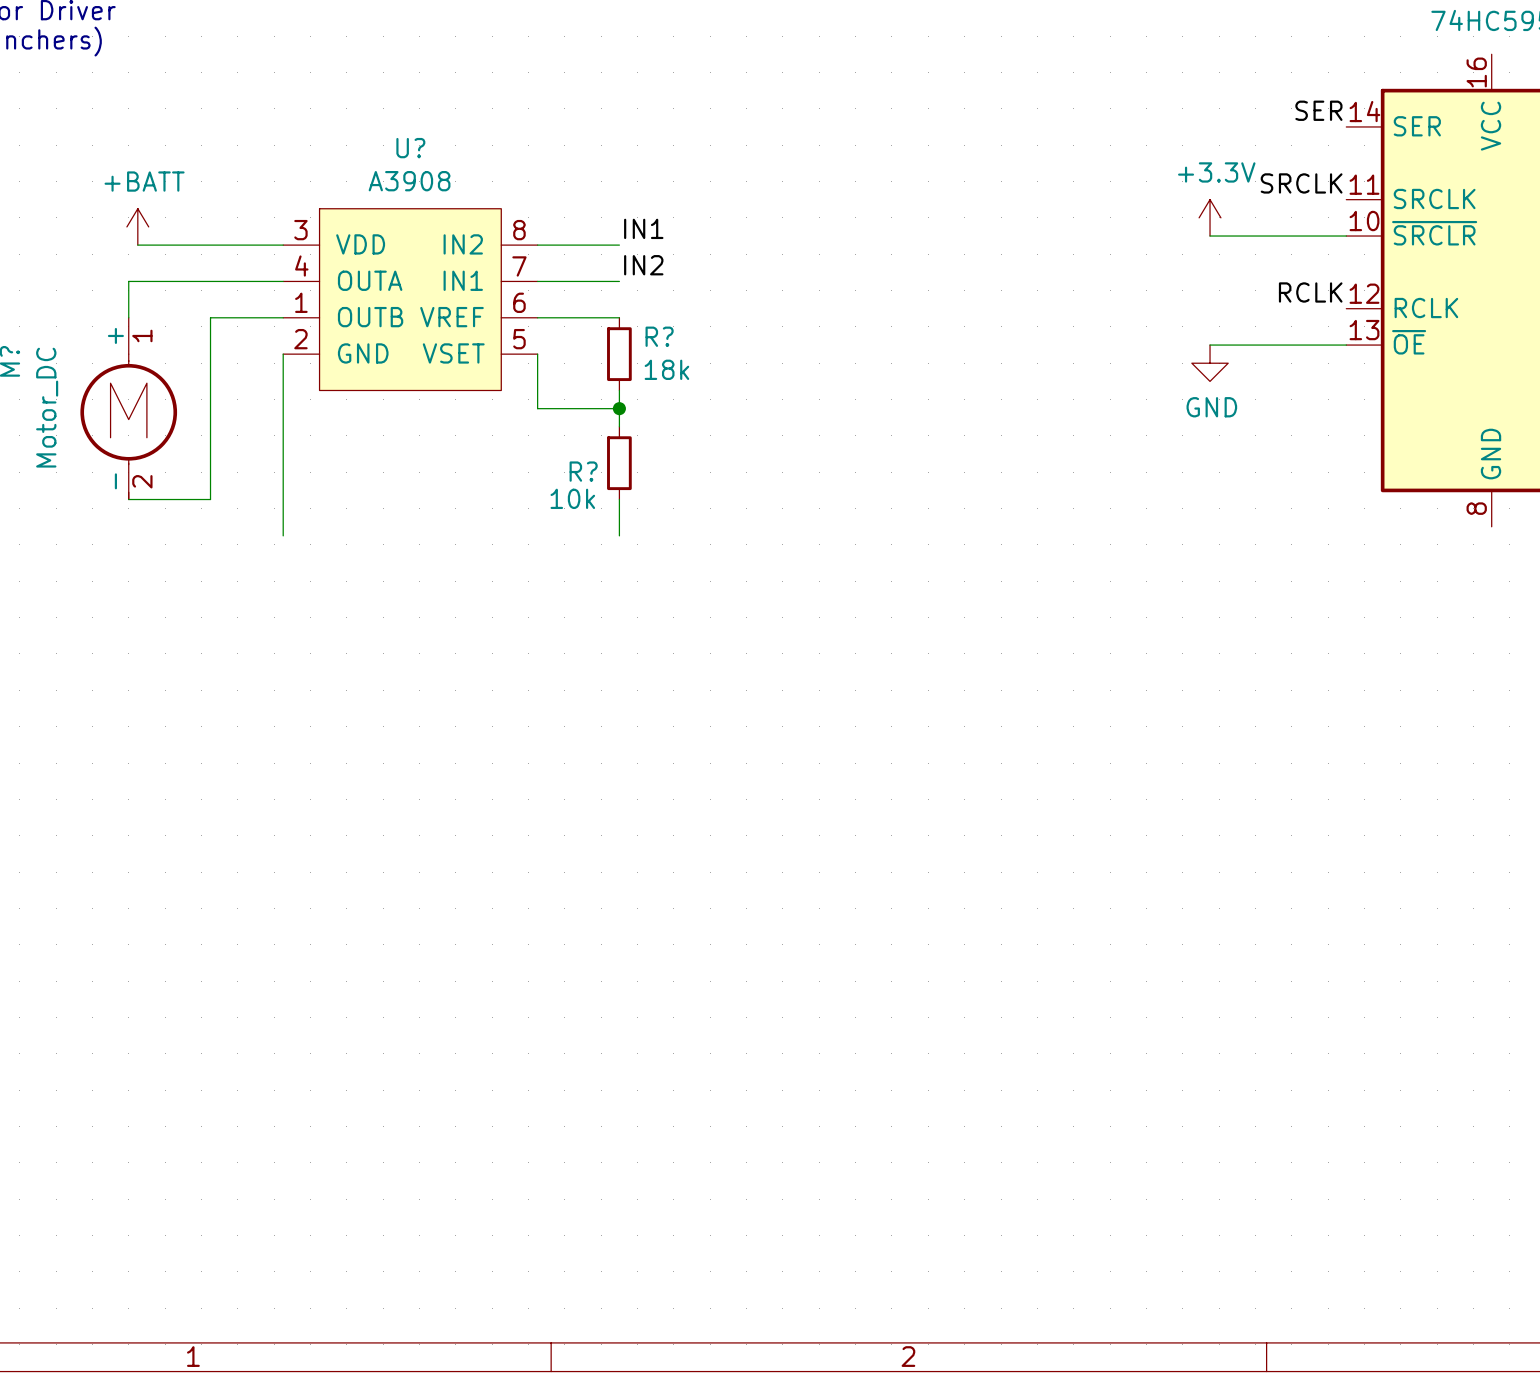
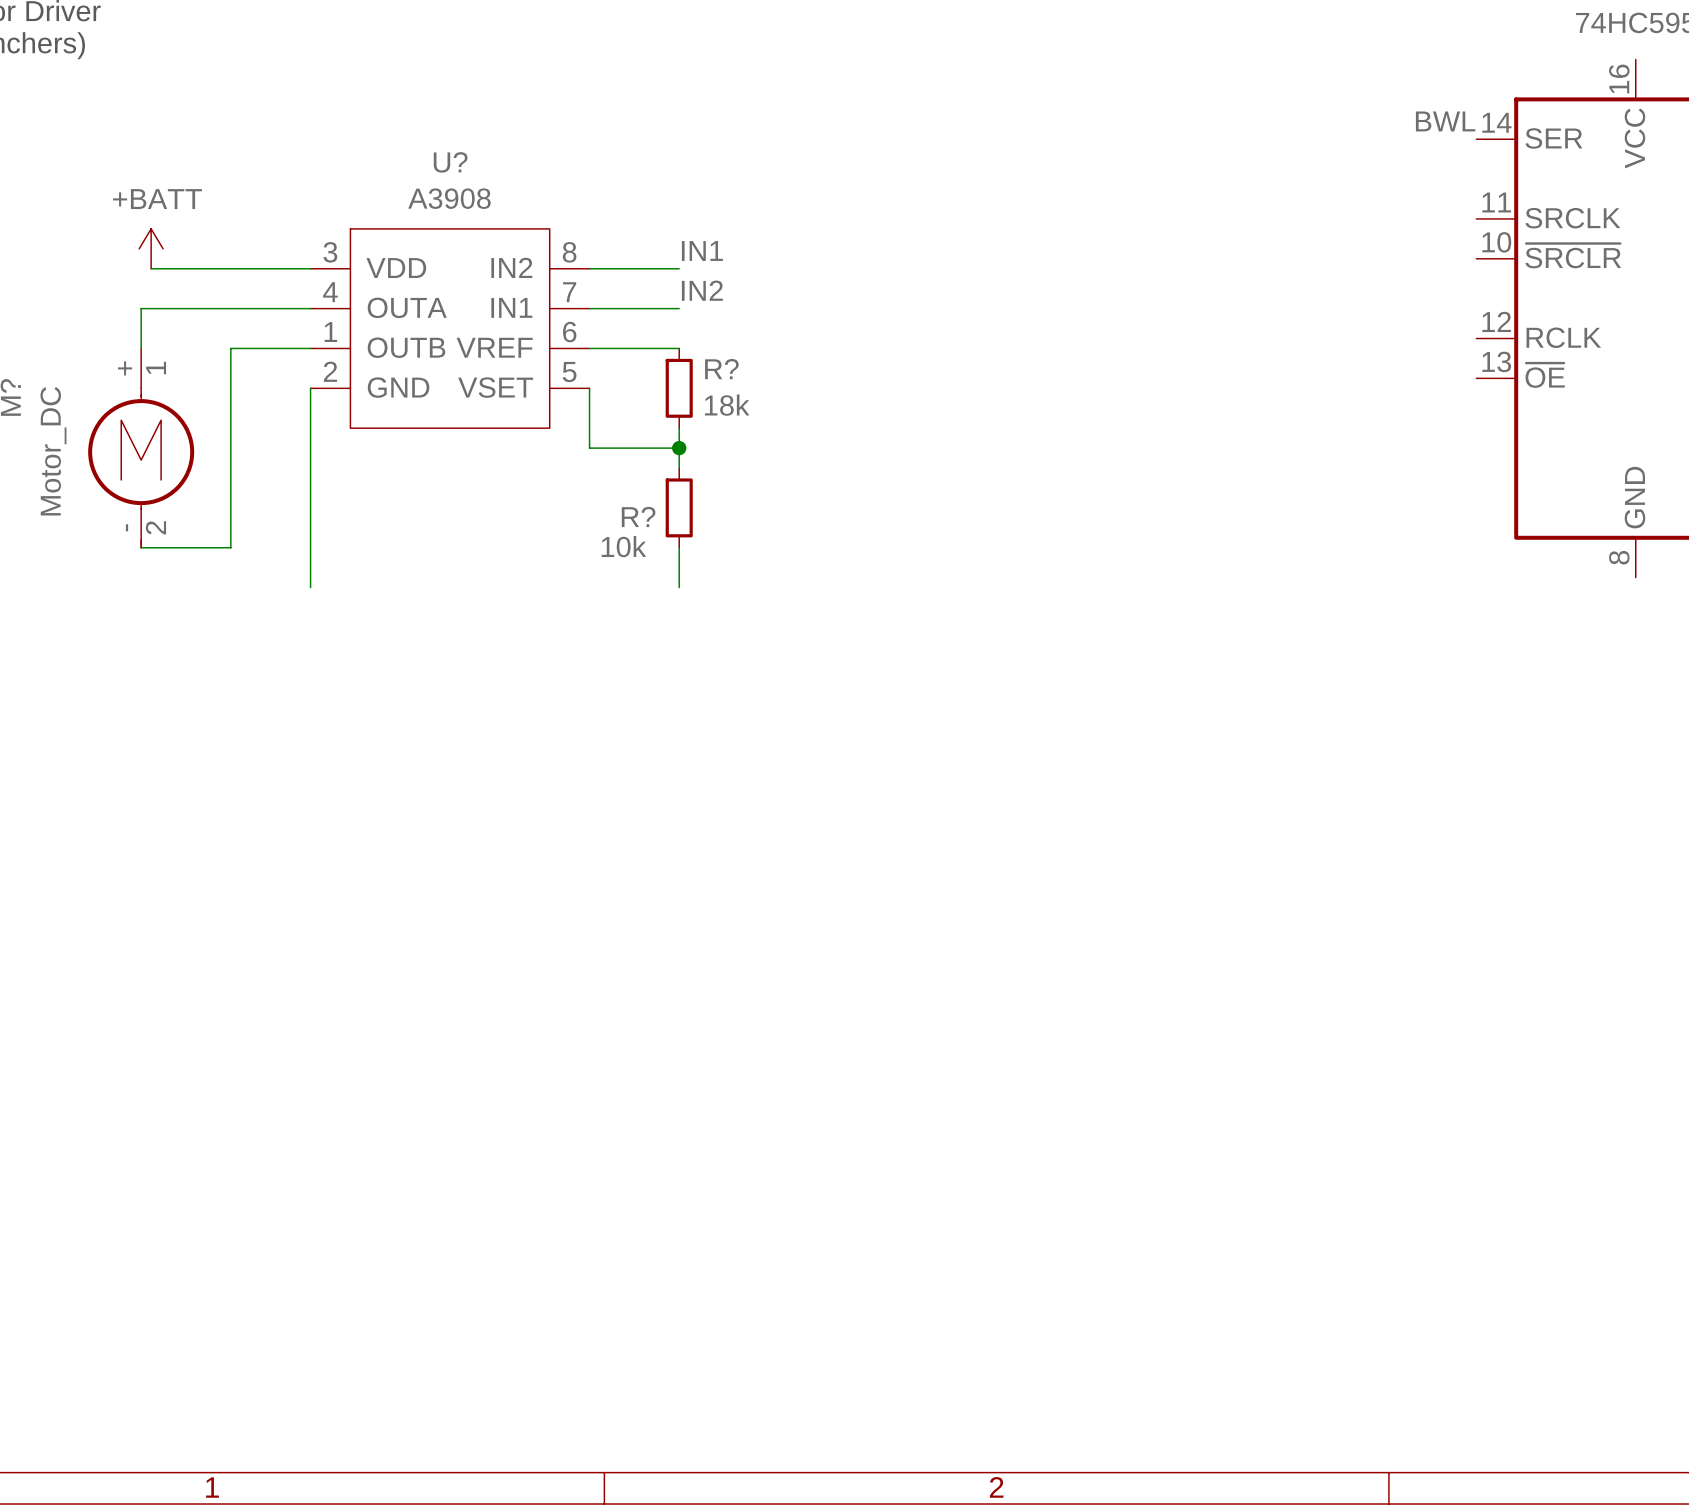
label: SER (1318, 110) -> BWL (1445, 121)
label: SRCLK (1301, 183) -> none
power symbol: +3.3V (1210, 217) -> none
wire: (1210, 236) (1346, 236) -> none
label: RCLK (1310, 292) -> none
wire: (1210, 345) (1346, 345) -> none
power symbol: GND (1210, 363) -> none

